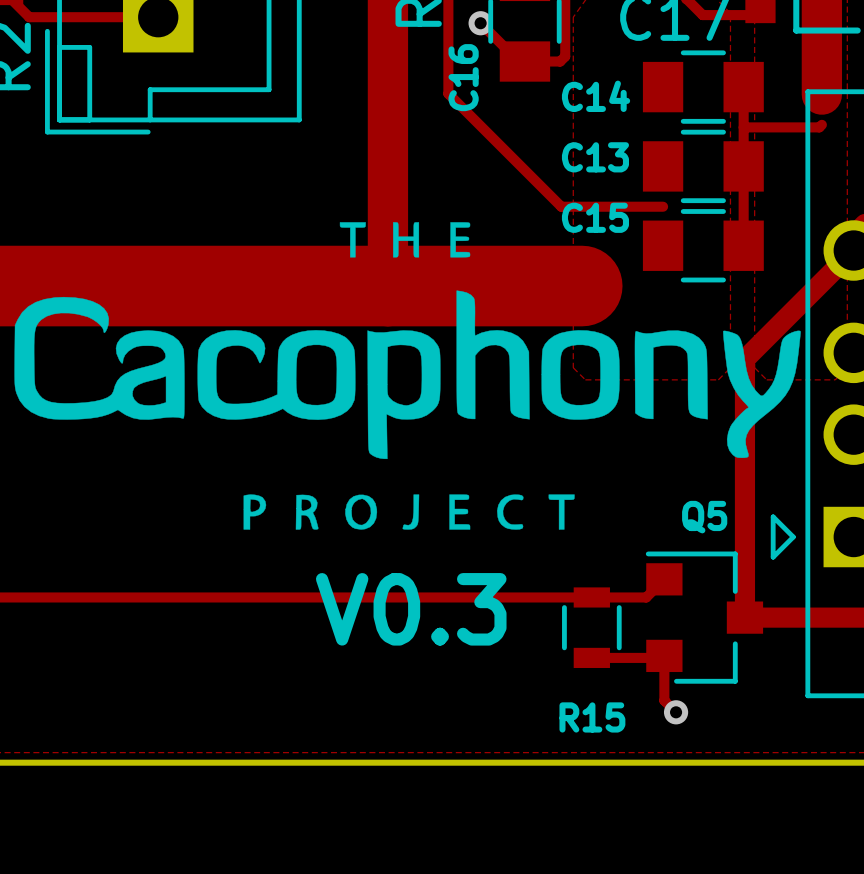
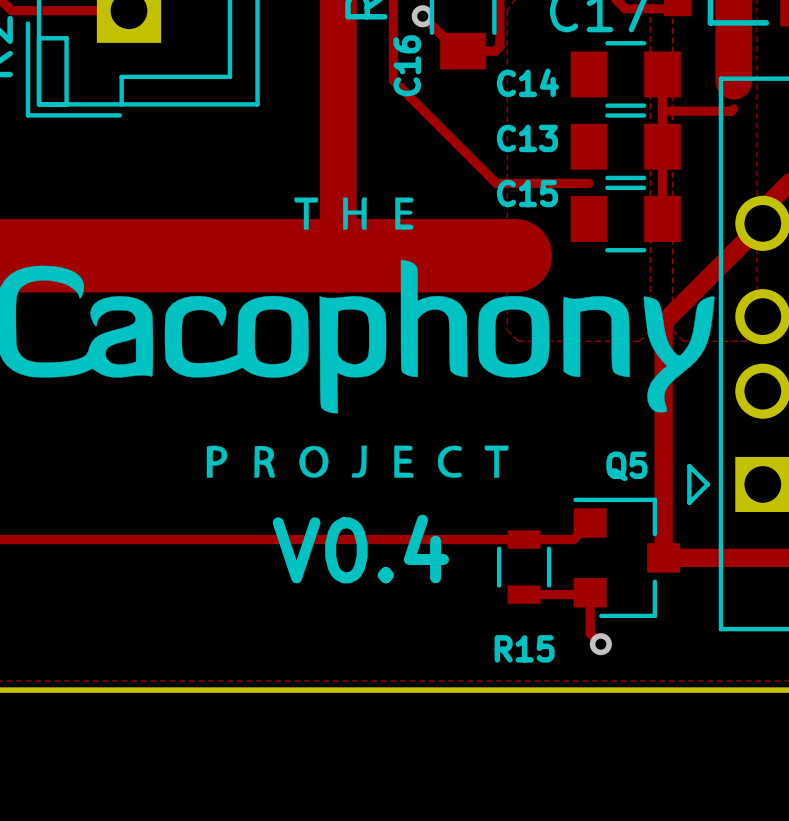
text: V0.3 (411, 609) -> V0.4 (360, 549)

